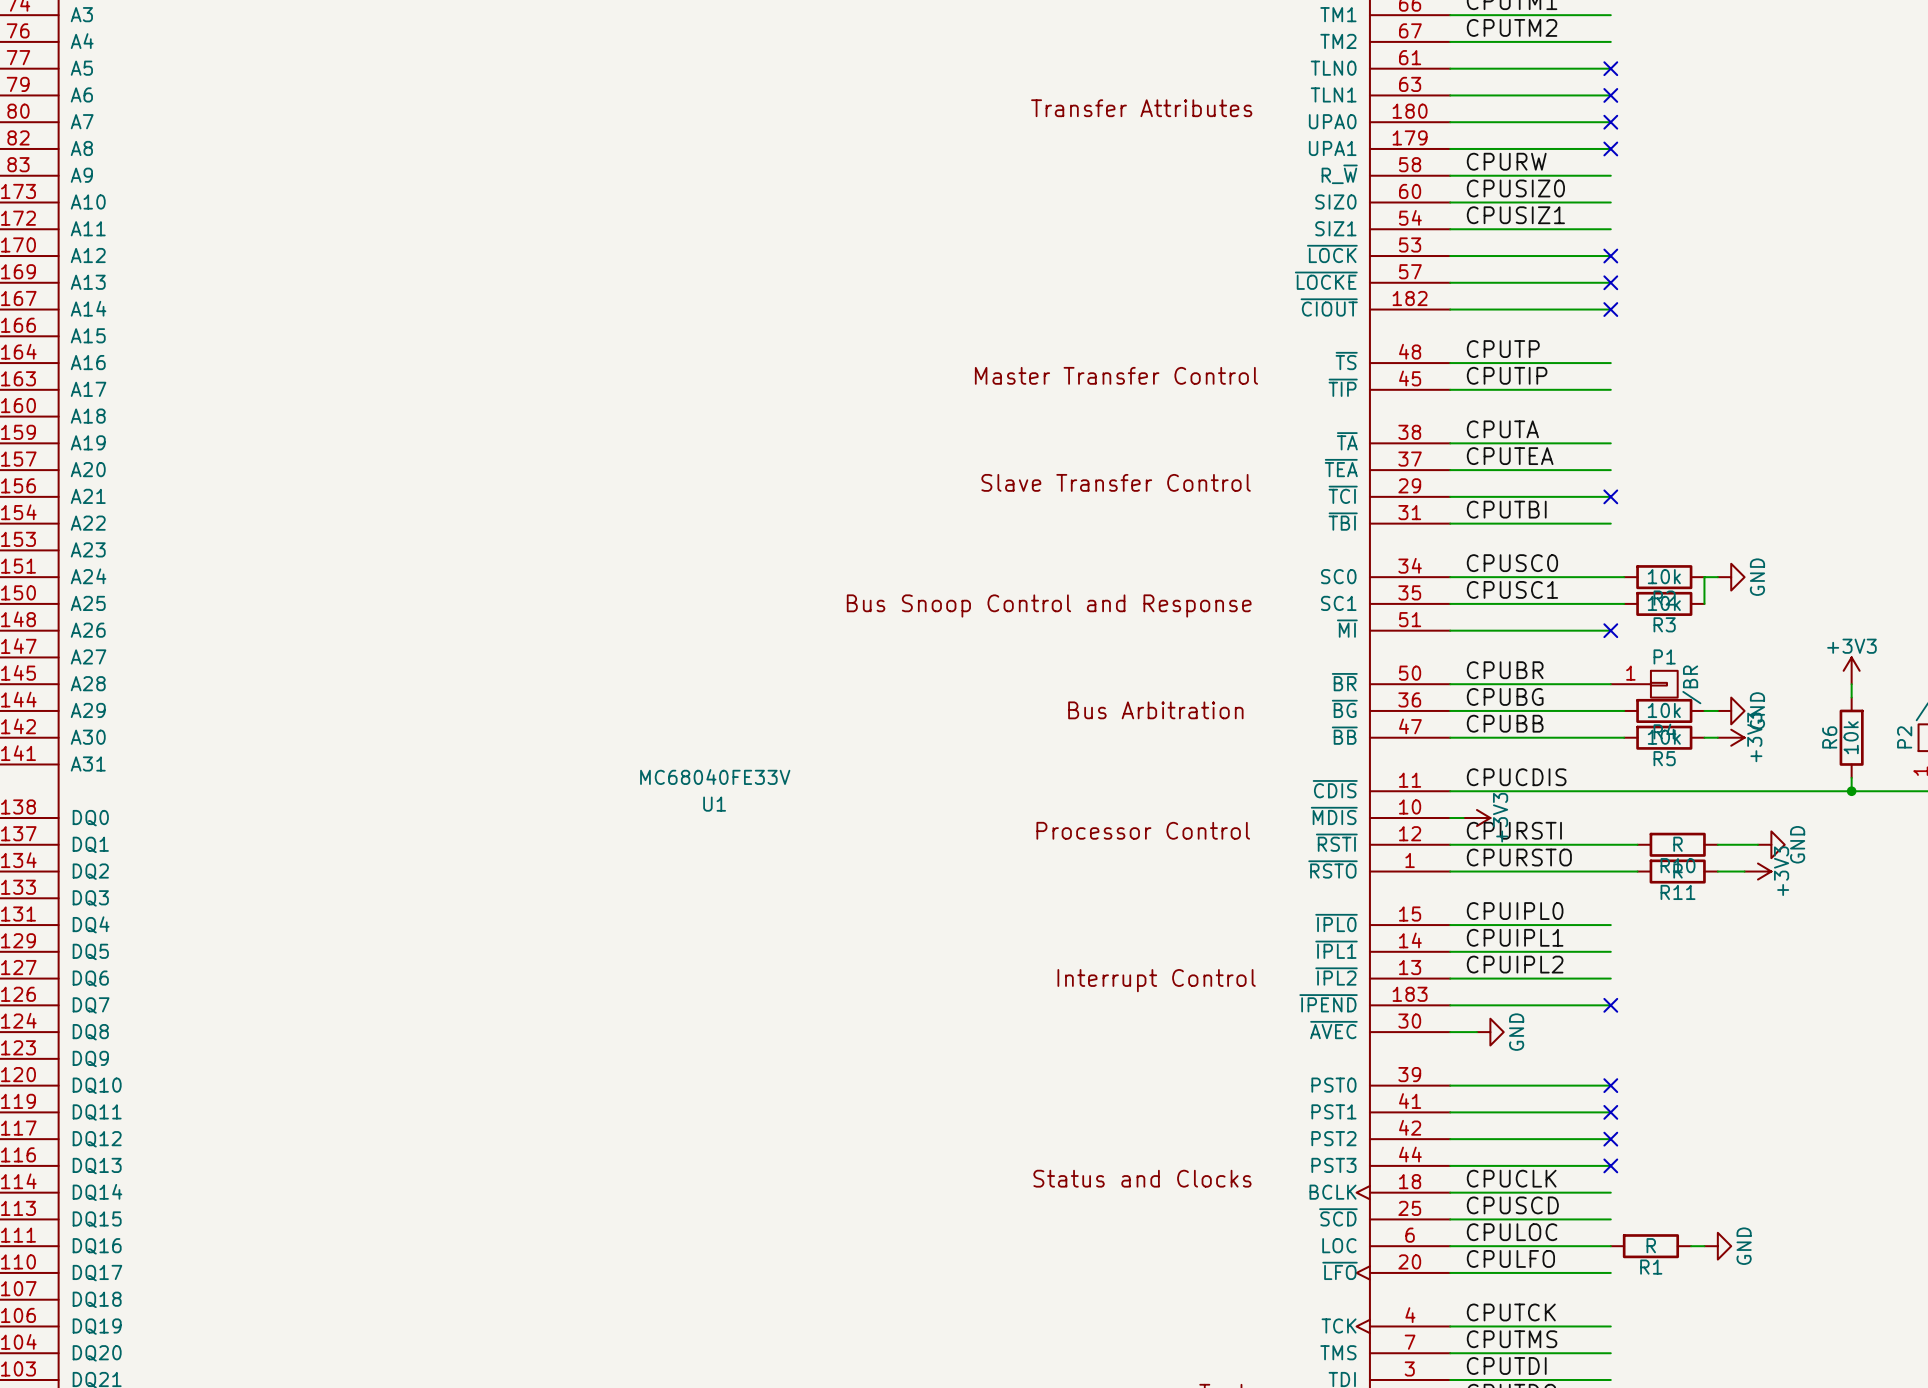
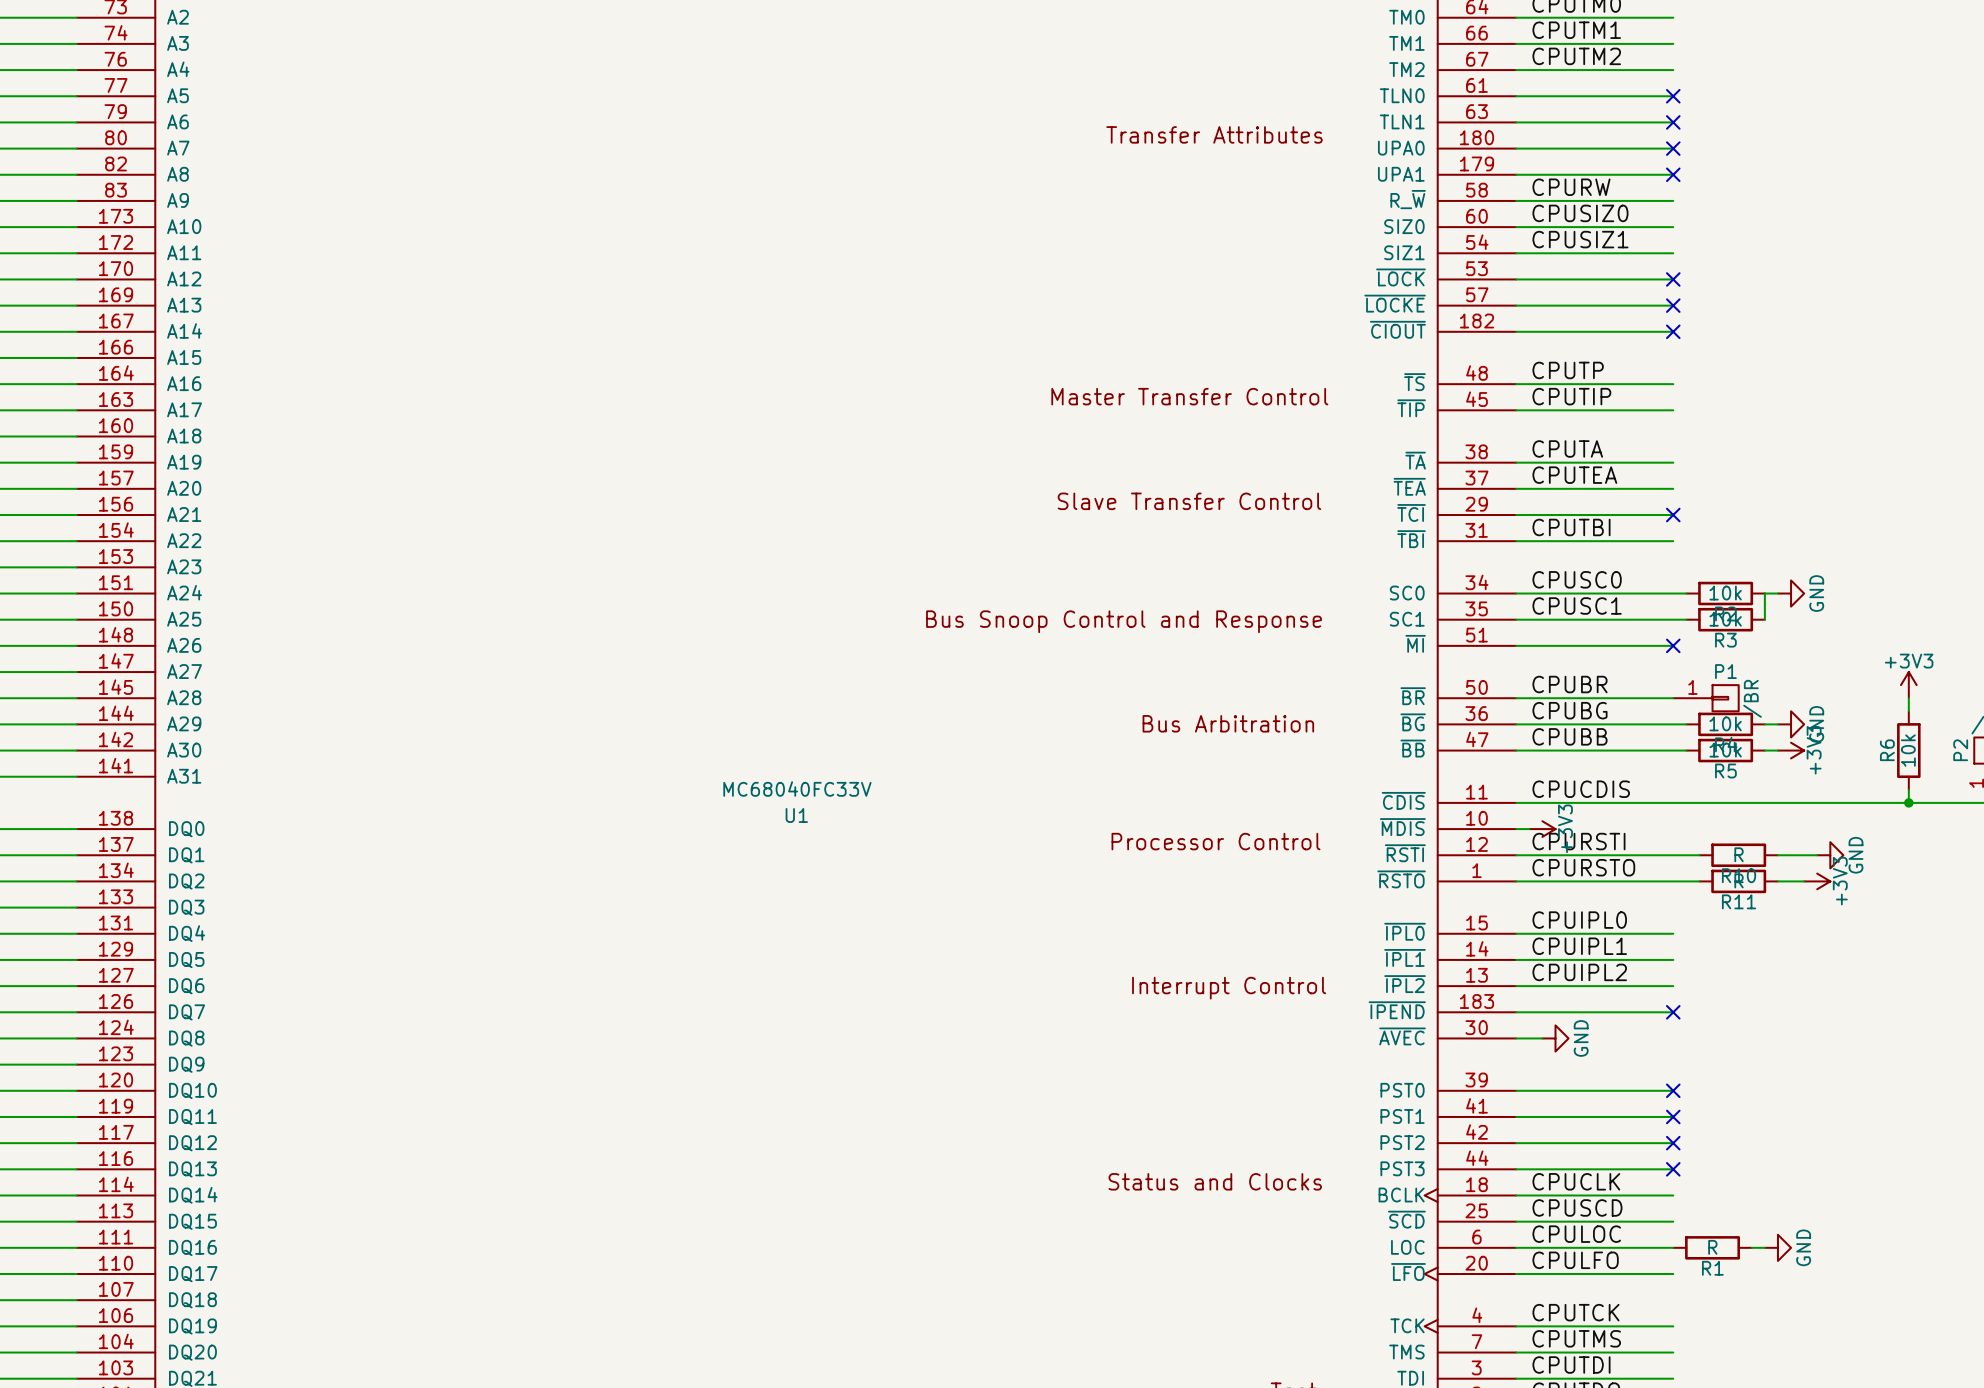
U1 value: MC68040FE33V (715, 777) -> MC68040FC33V (797, 789)

